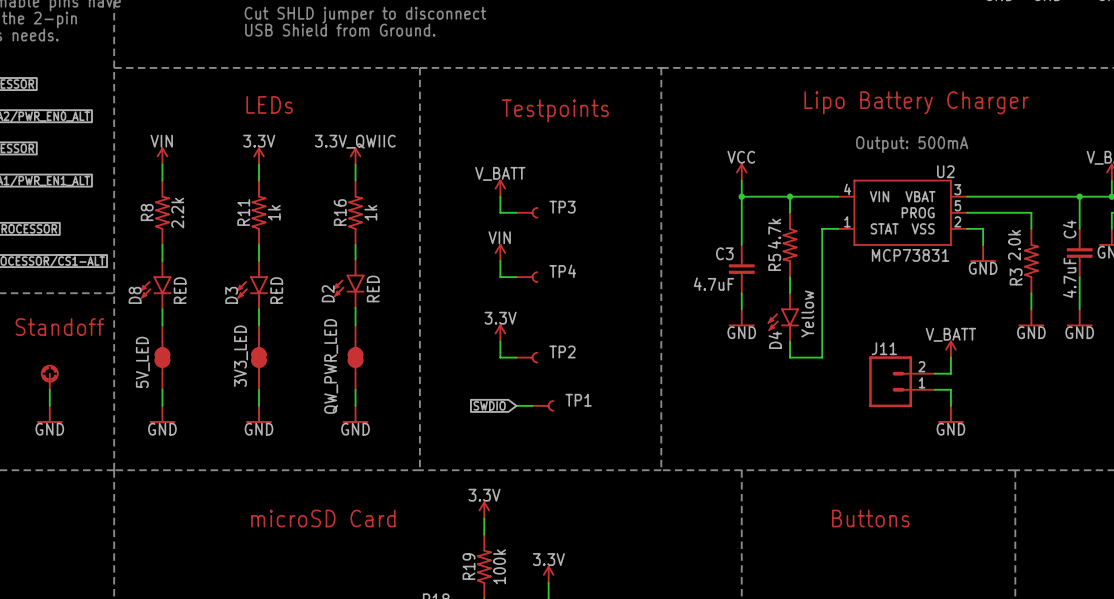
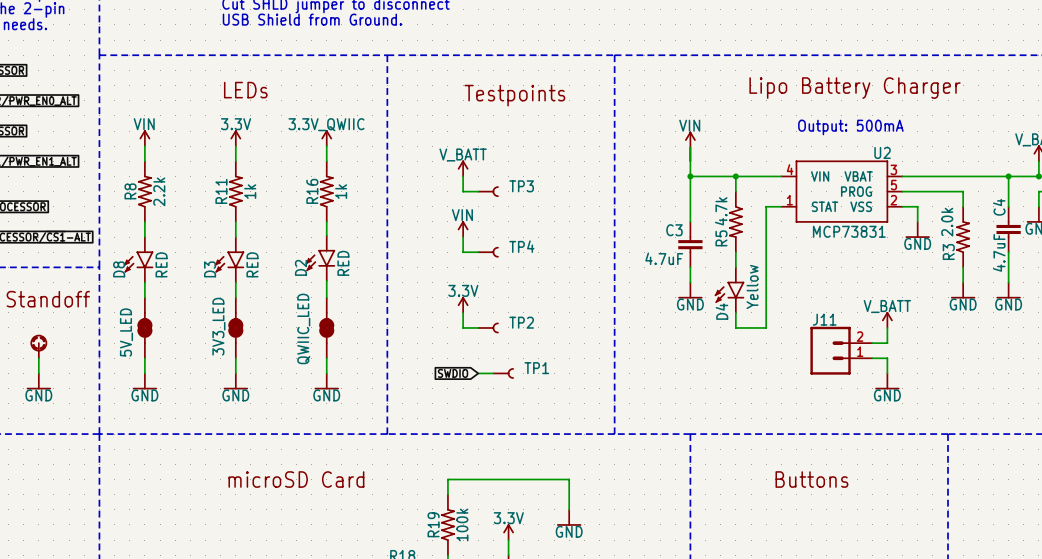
power symbol: none -> VIN (690, 139)
power symbol: VCC (741, 172) -> none
QW_PWR_LED name: QW_PWR_LED (331, 366) -> QWIIC_LED (303, 328)
power symbol: 3.3V (484, 510) -> none
wire: none -> (447, 479) (569, 479) (569, 509)
power symbol: none -> GND (569, 517)

